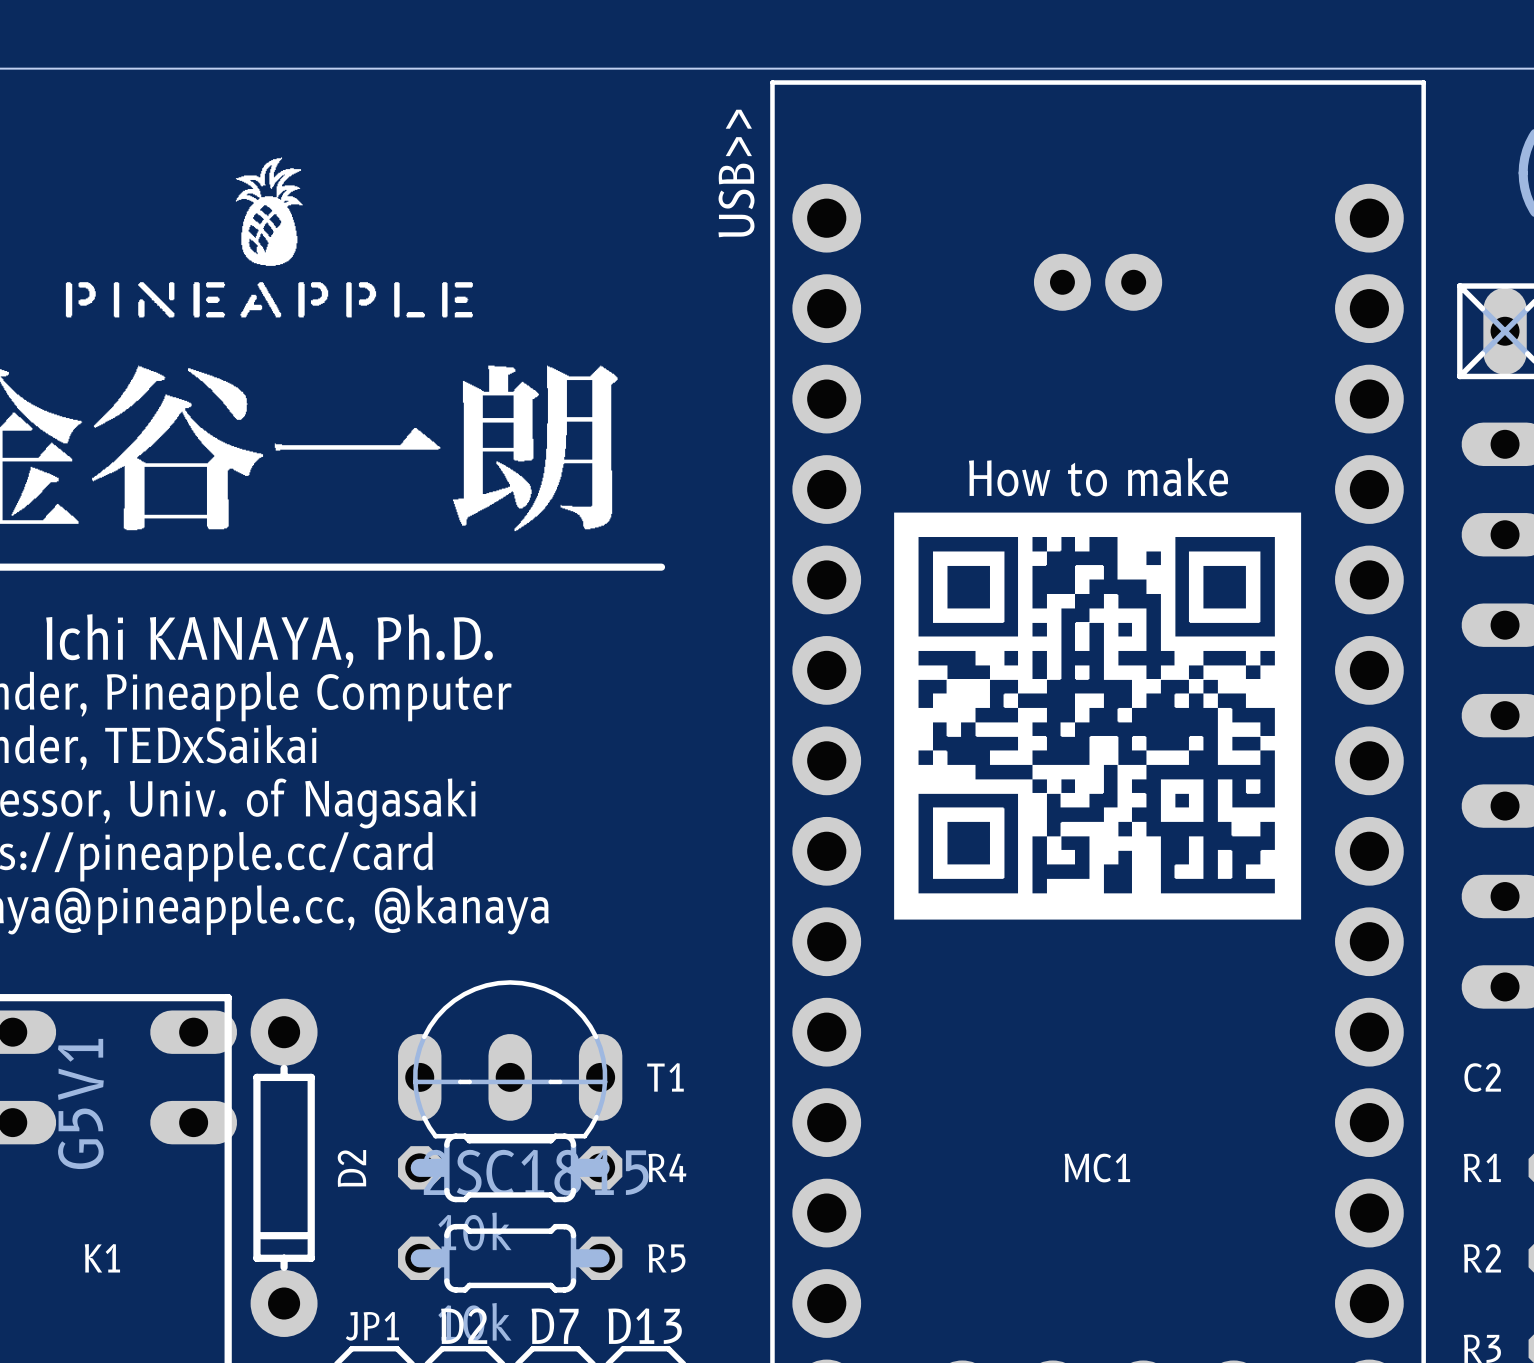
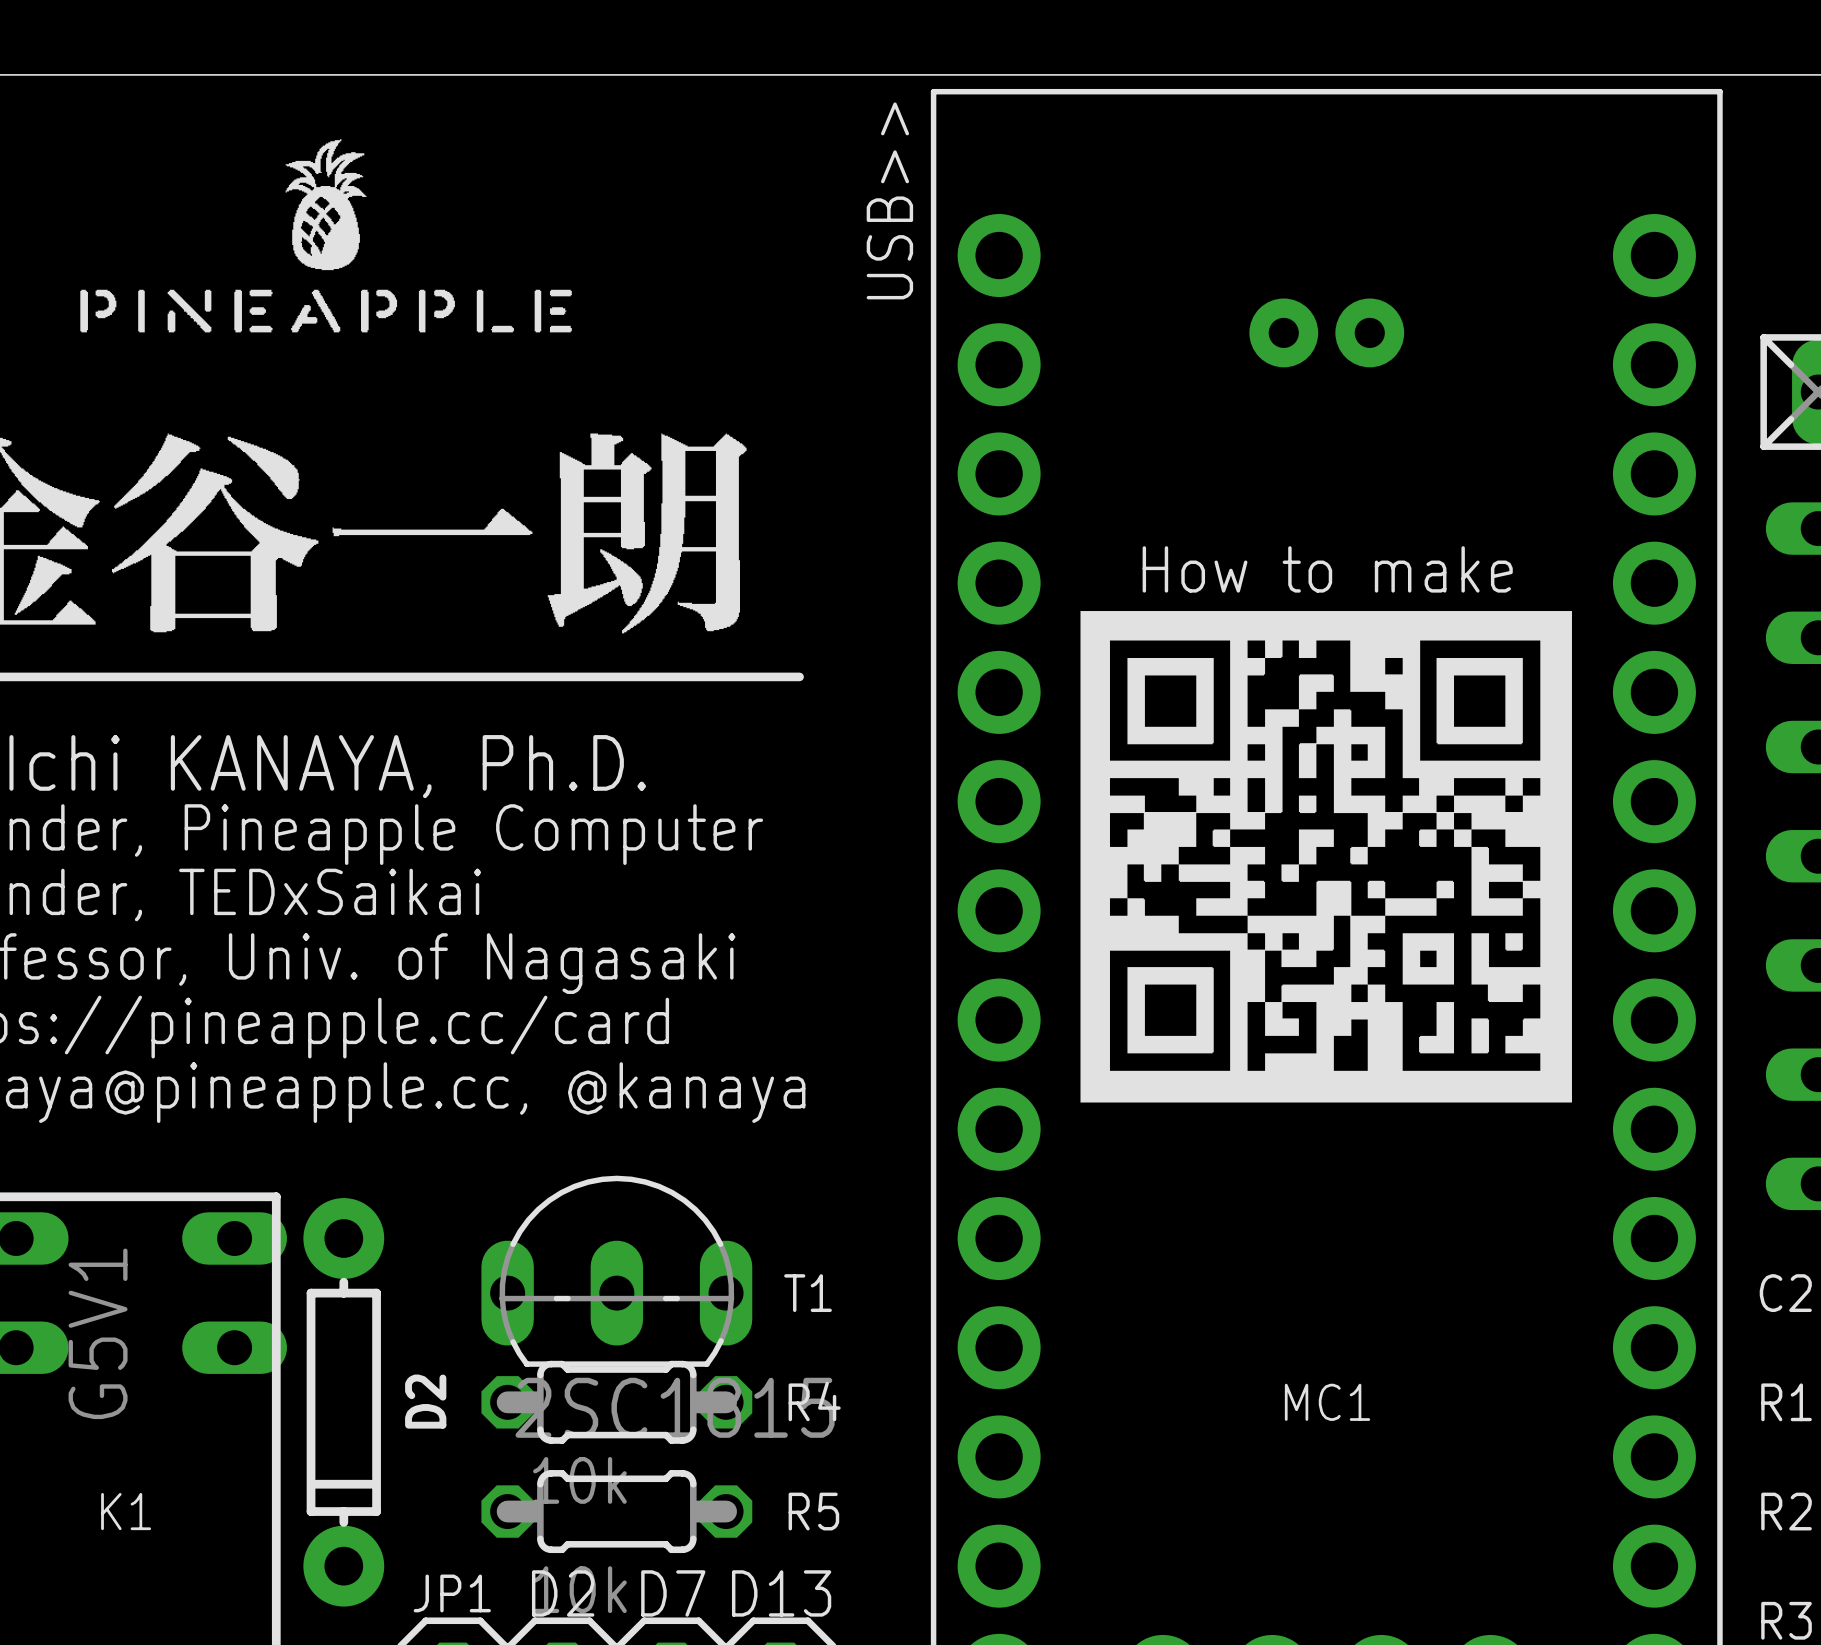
drawing position: (269, 237) -> (326, 235)

